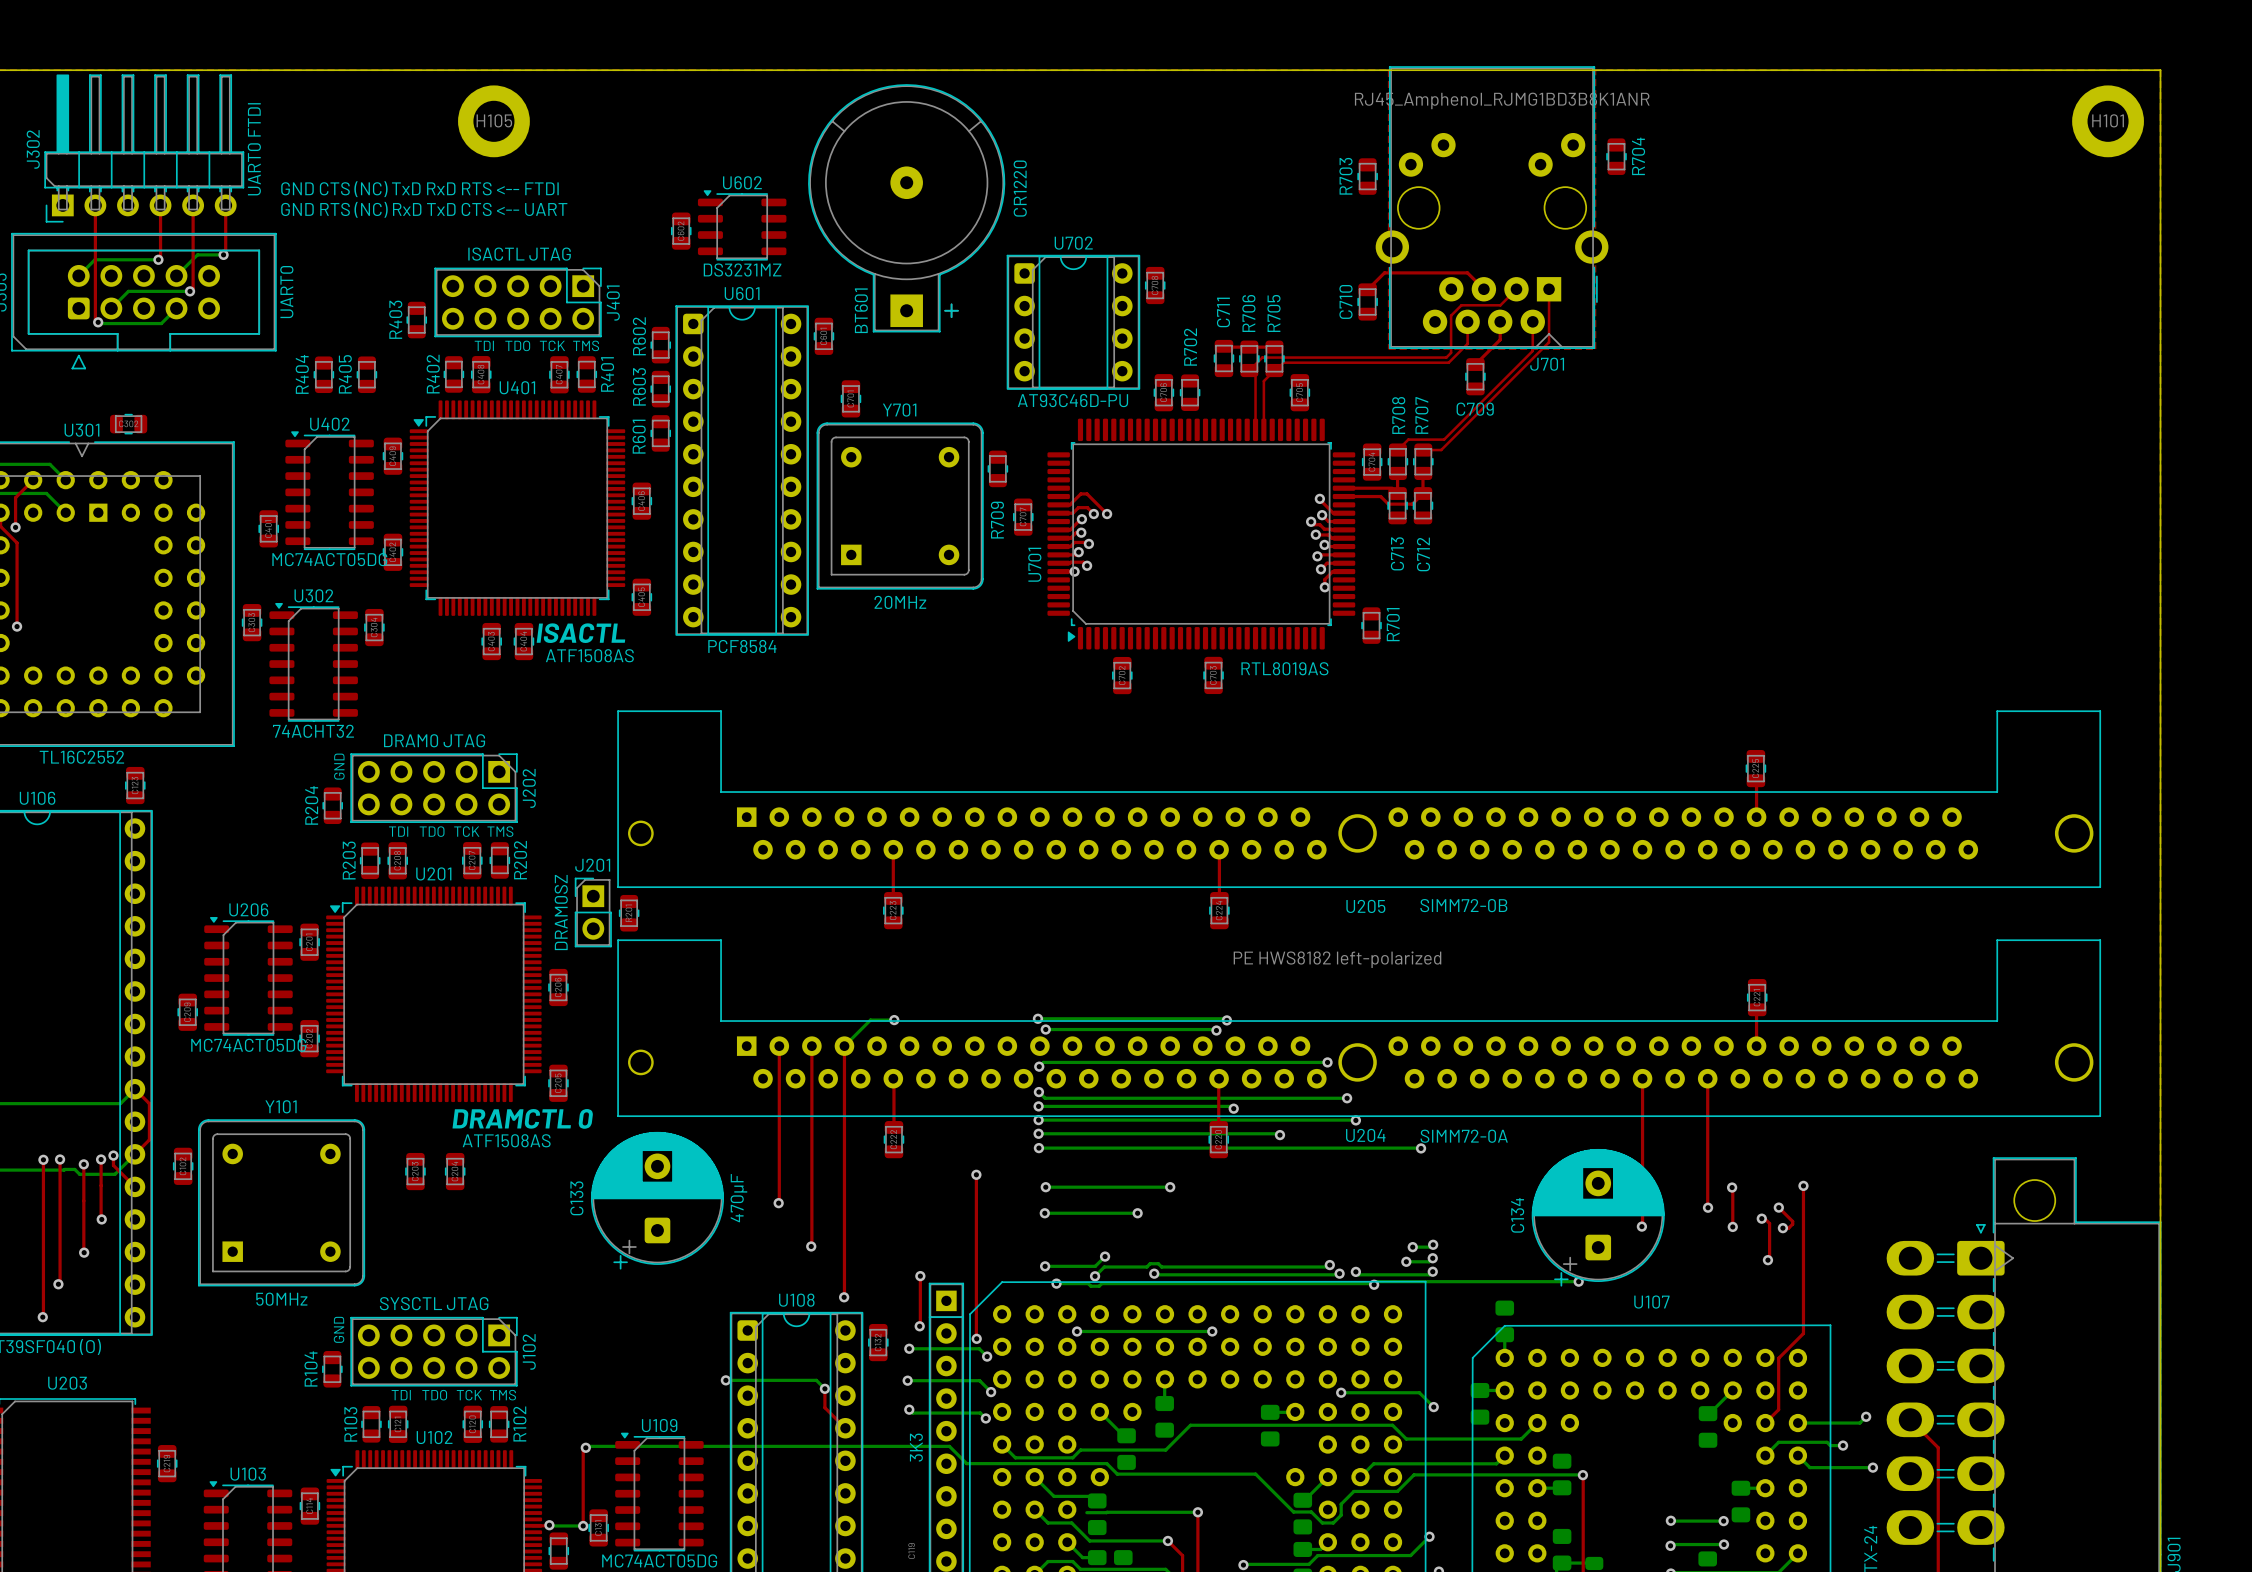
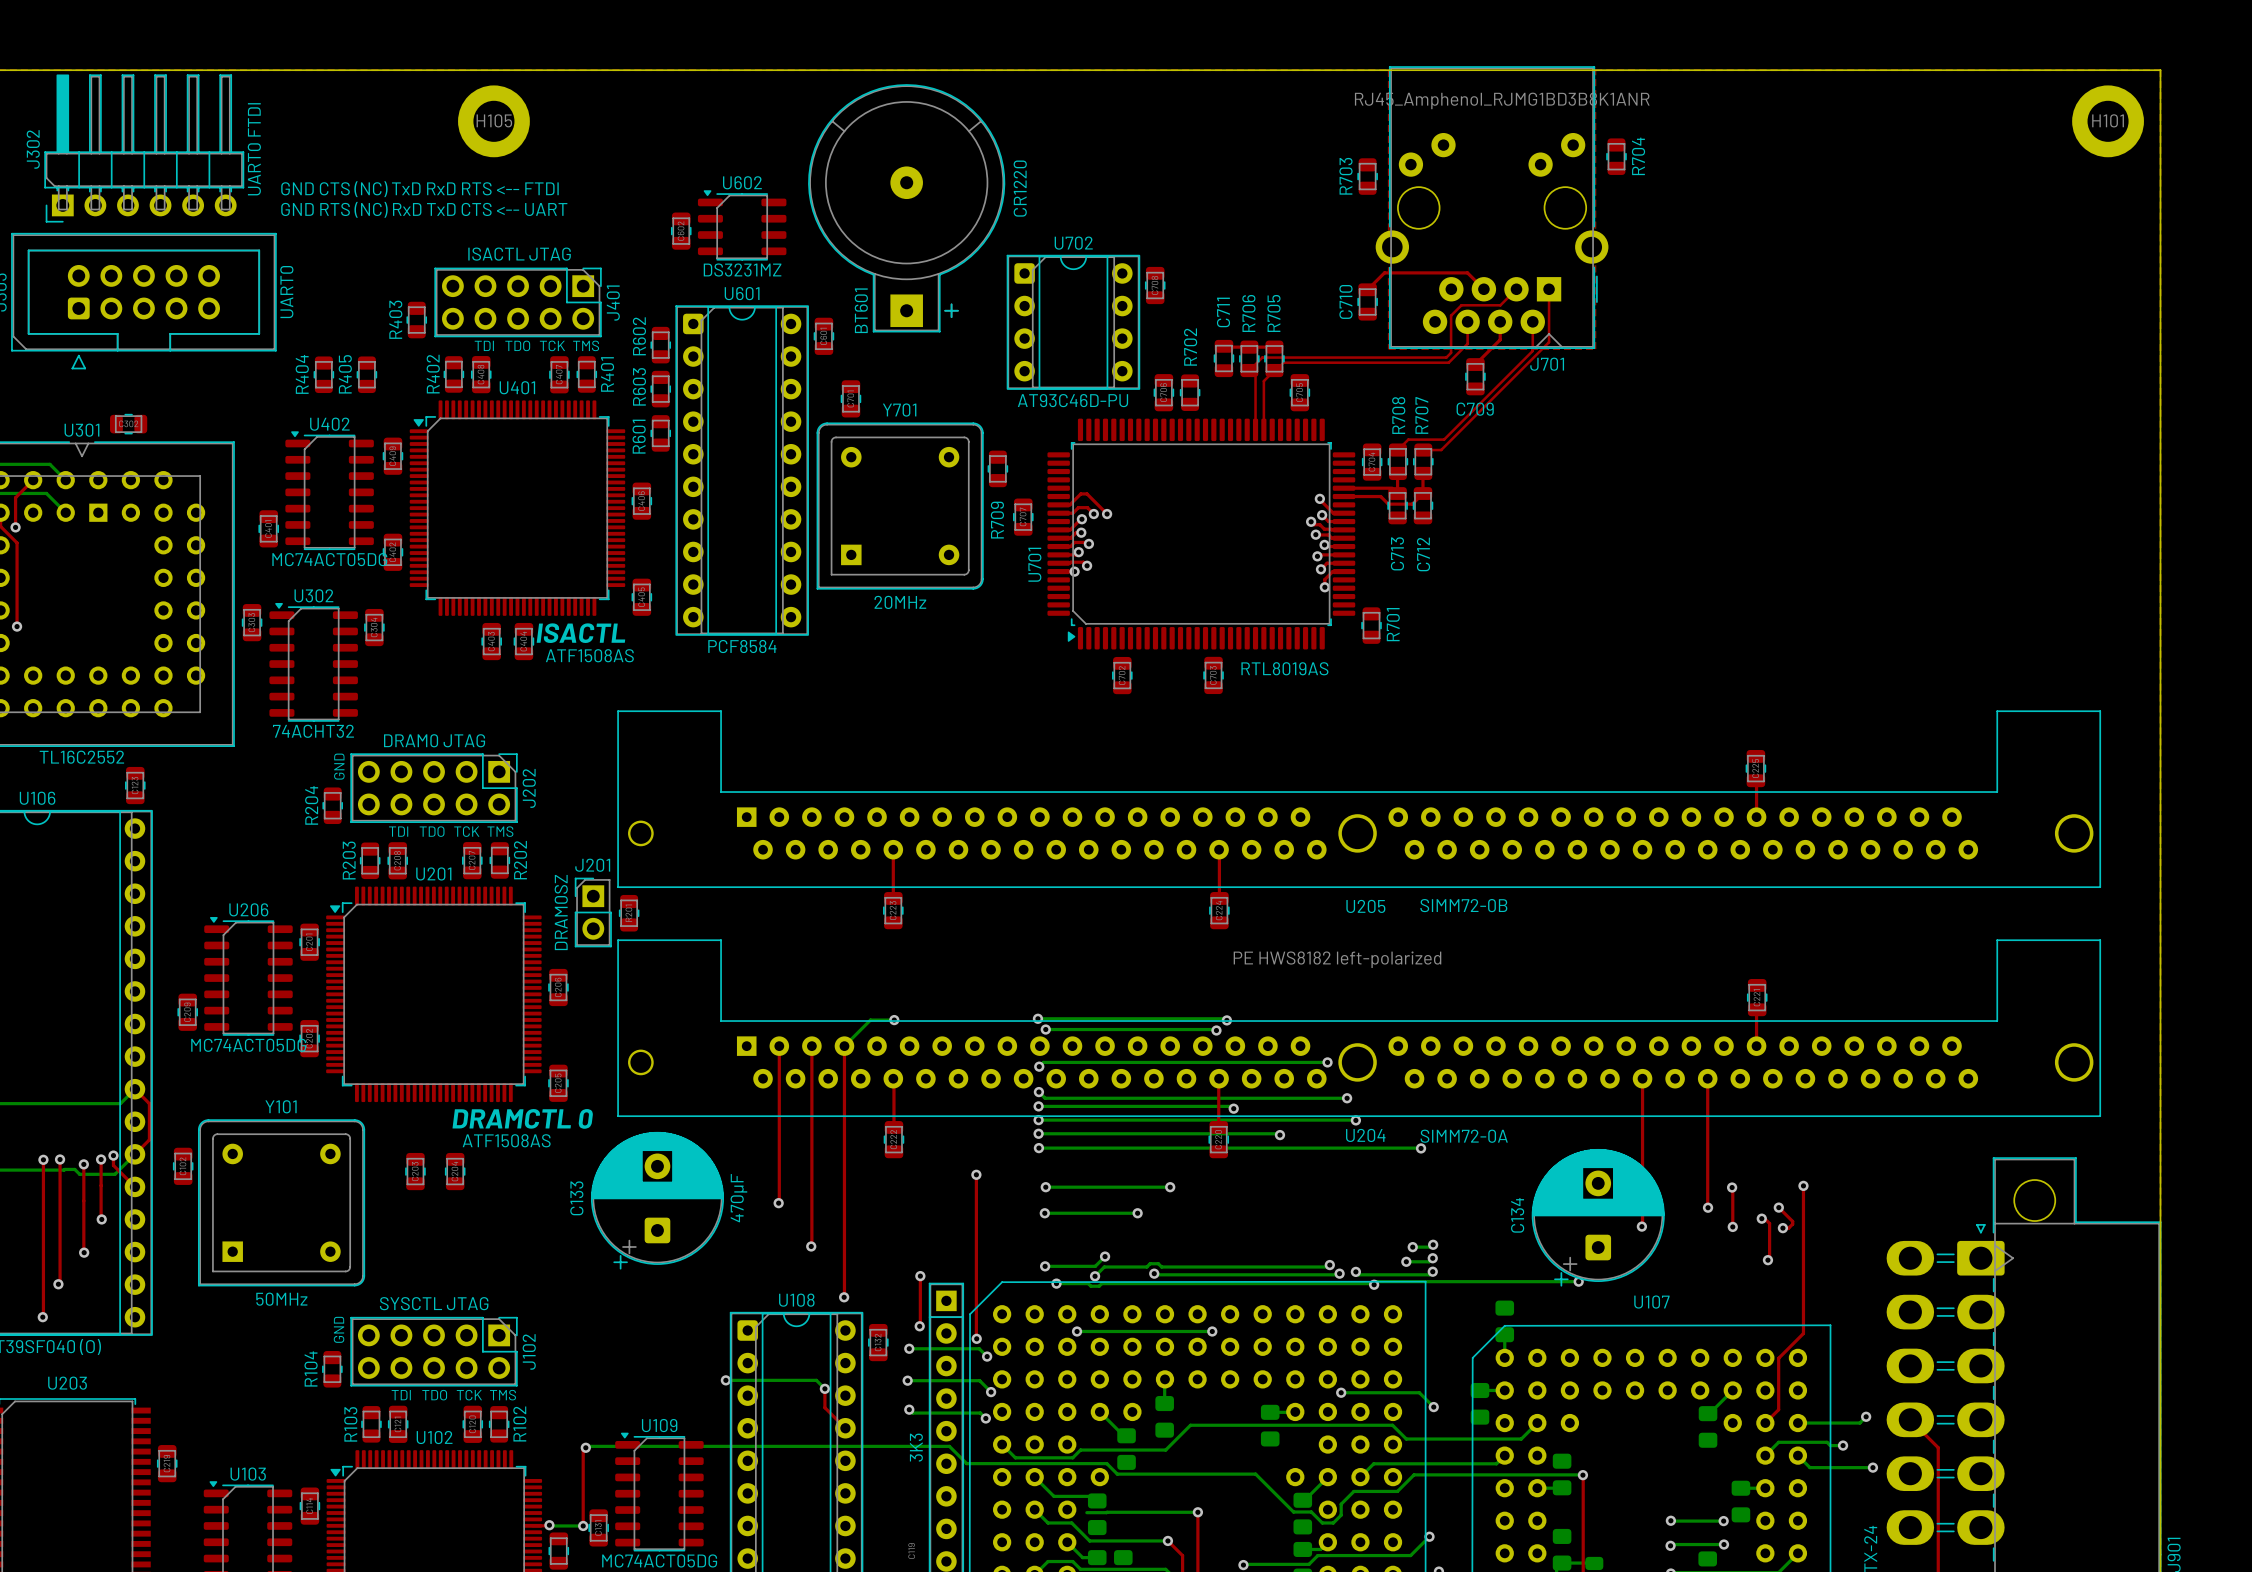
top track: (95, 205) (95, 319) (98, 322) -> none
top track: (160, 205) (160, 257) (158, 259) -> none
top track: (193, 205) (193, 288) (190, 291) -> none
top track: (225, 205) (225, 252) (223, 254) -> none
bottom track: (223, 254) (197, 254) (176, 275) -> none
via: (223, 254) -> none
bottom track: (158, 259) (94, 259) (78, 275) -> none
via: (158, 259) -> none
bottom track: (190, 291) (128, 291) (111, 308) -> none
via: (190, 291) -> none
bottom track: (176, 308) (161, 323) (98, 322) -> none
via: (98, 322) -> none

